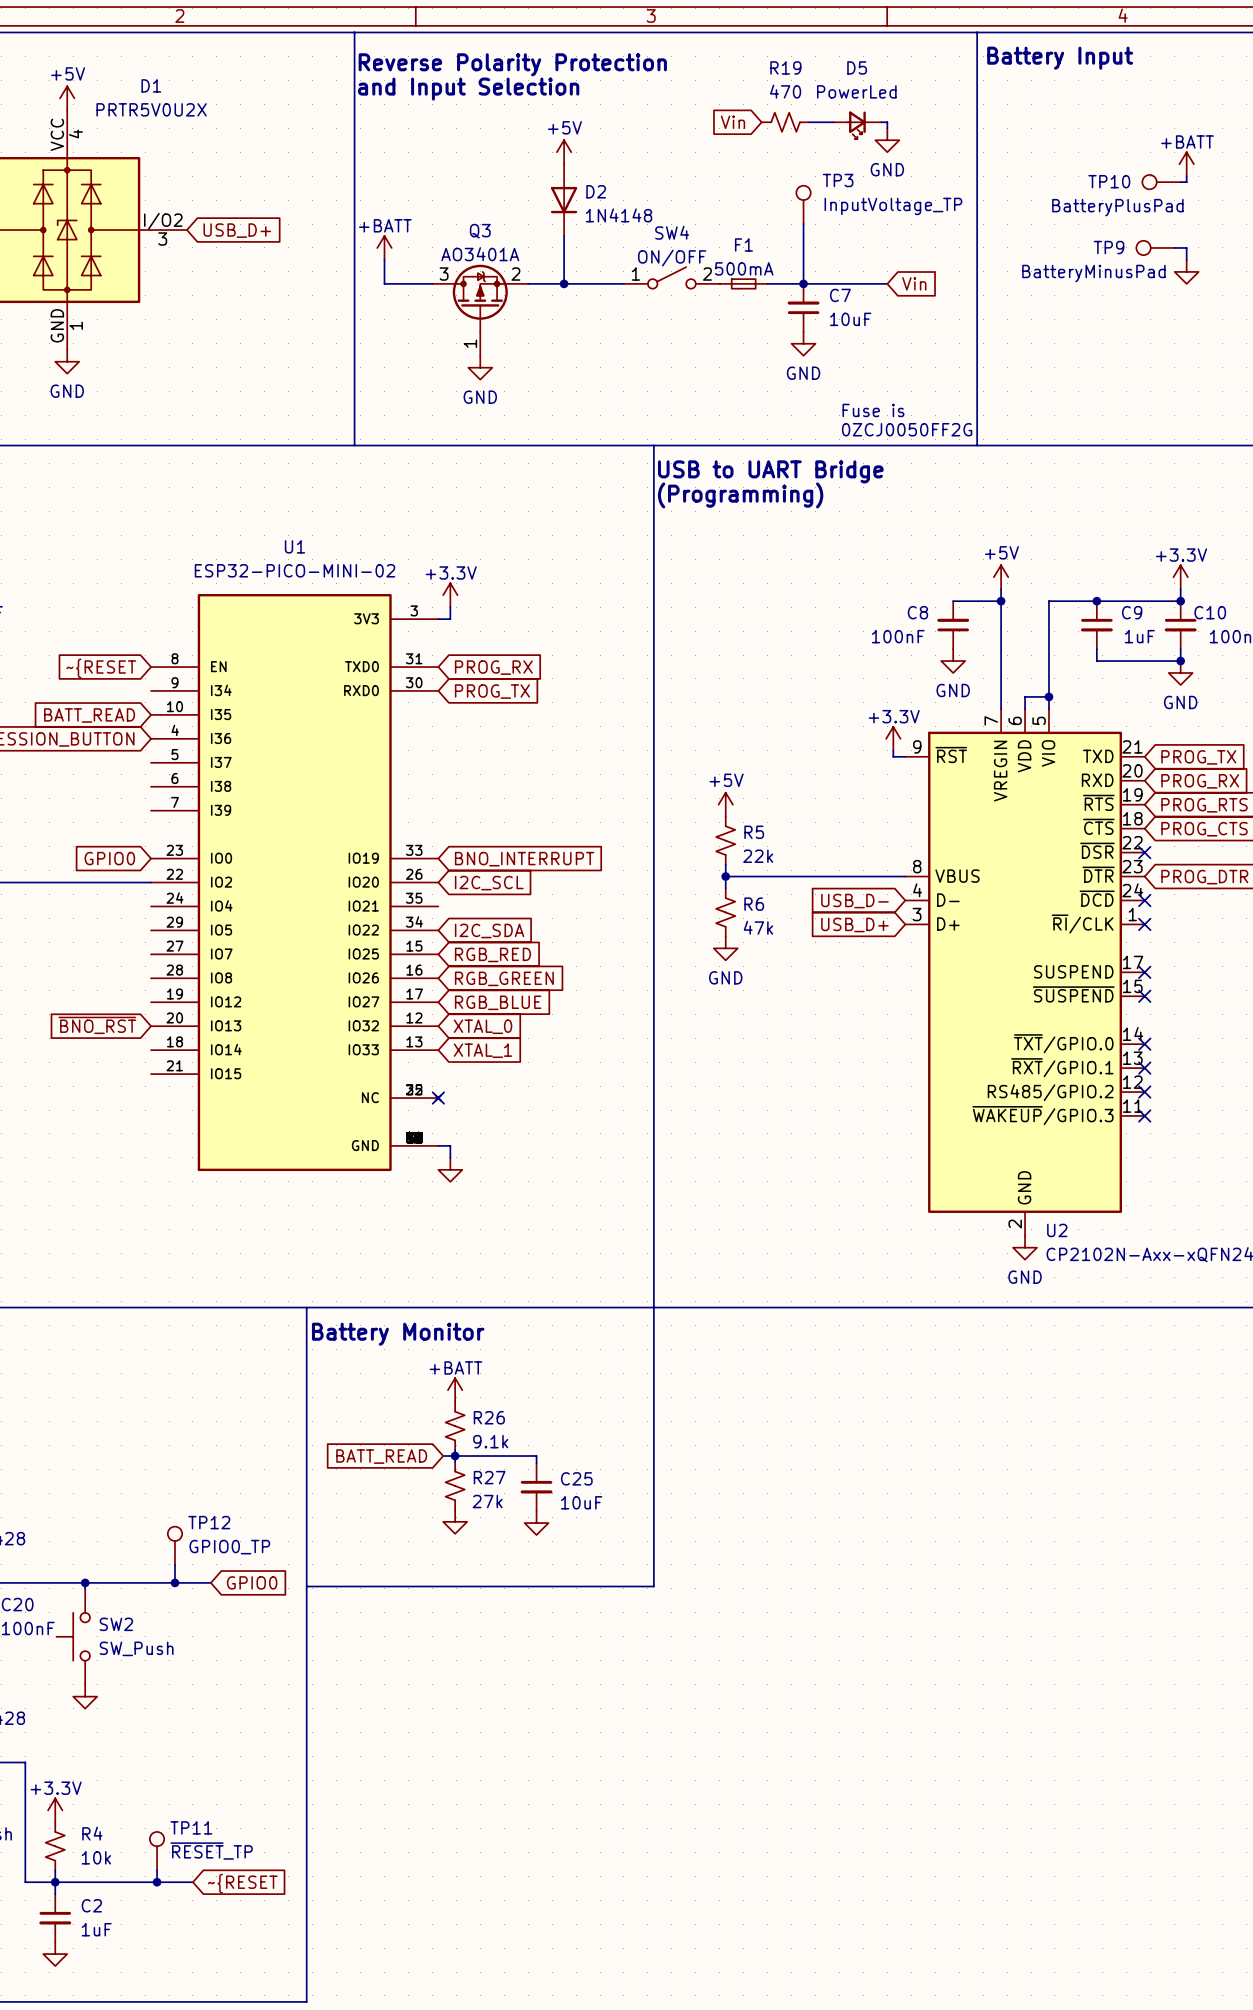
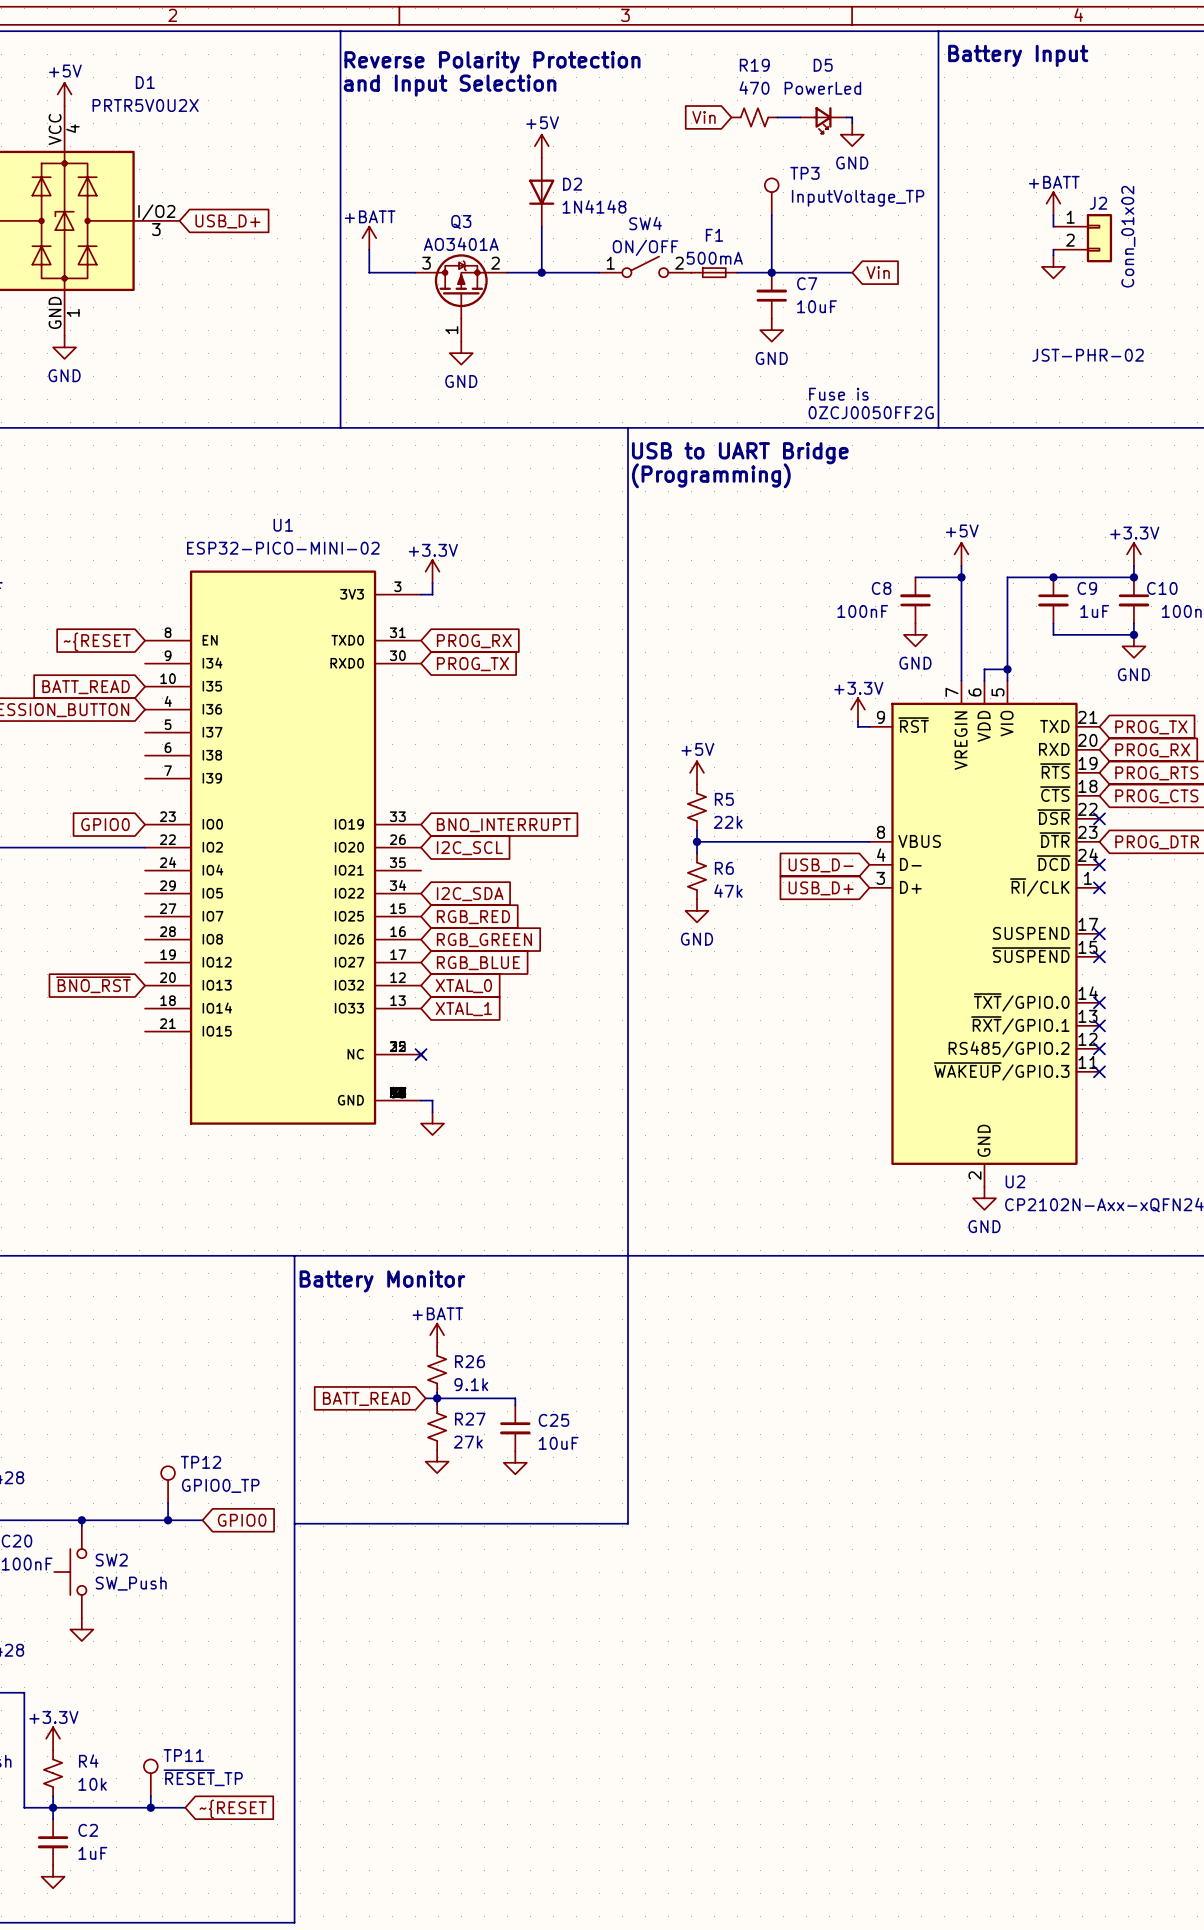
power symbol position: +BATT (1186, 164) -> +BATT (1053, 203)
wire: (1186, 176) (1186, 182) (1180, 182) -> none
TP10: BatteryPlusPad (1161, 182) -> none
wire: none -> (1053, 215) (1053, 226)
J2: none -> Conn_01x02 (1082, 238)
TP9: BatteryMinusPad (1155, 247) -> none
wire: (1174, 247) (1186, 247) (1186, 259) -> none
wire: none -> (1053, 249) (1053, 255)
power symbol position: (1186, 271) -> (1053, 266)
text: none -> JST-PHR-02 (1088, 355)

